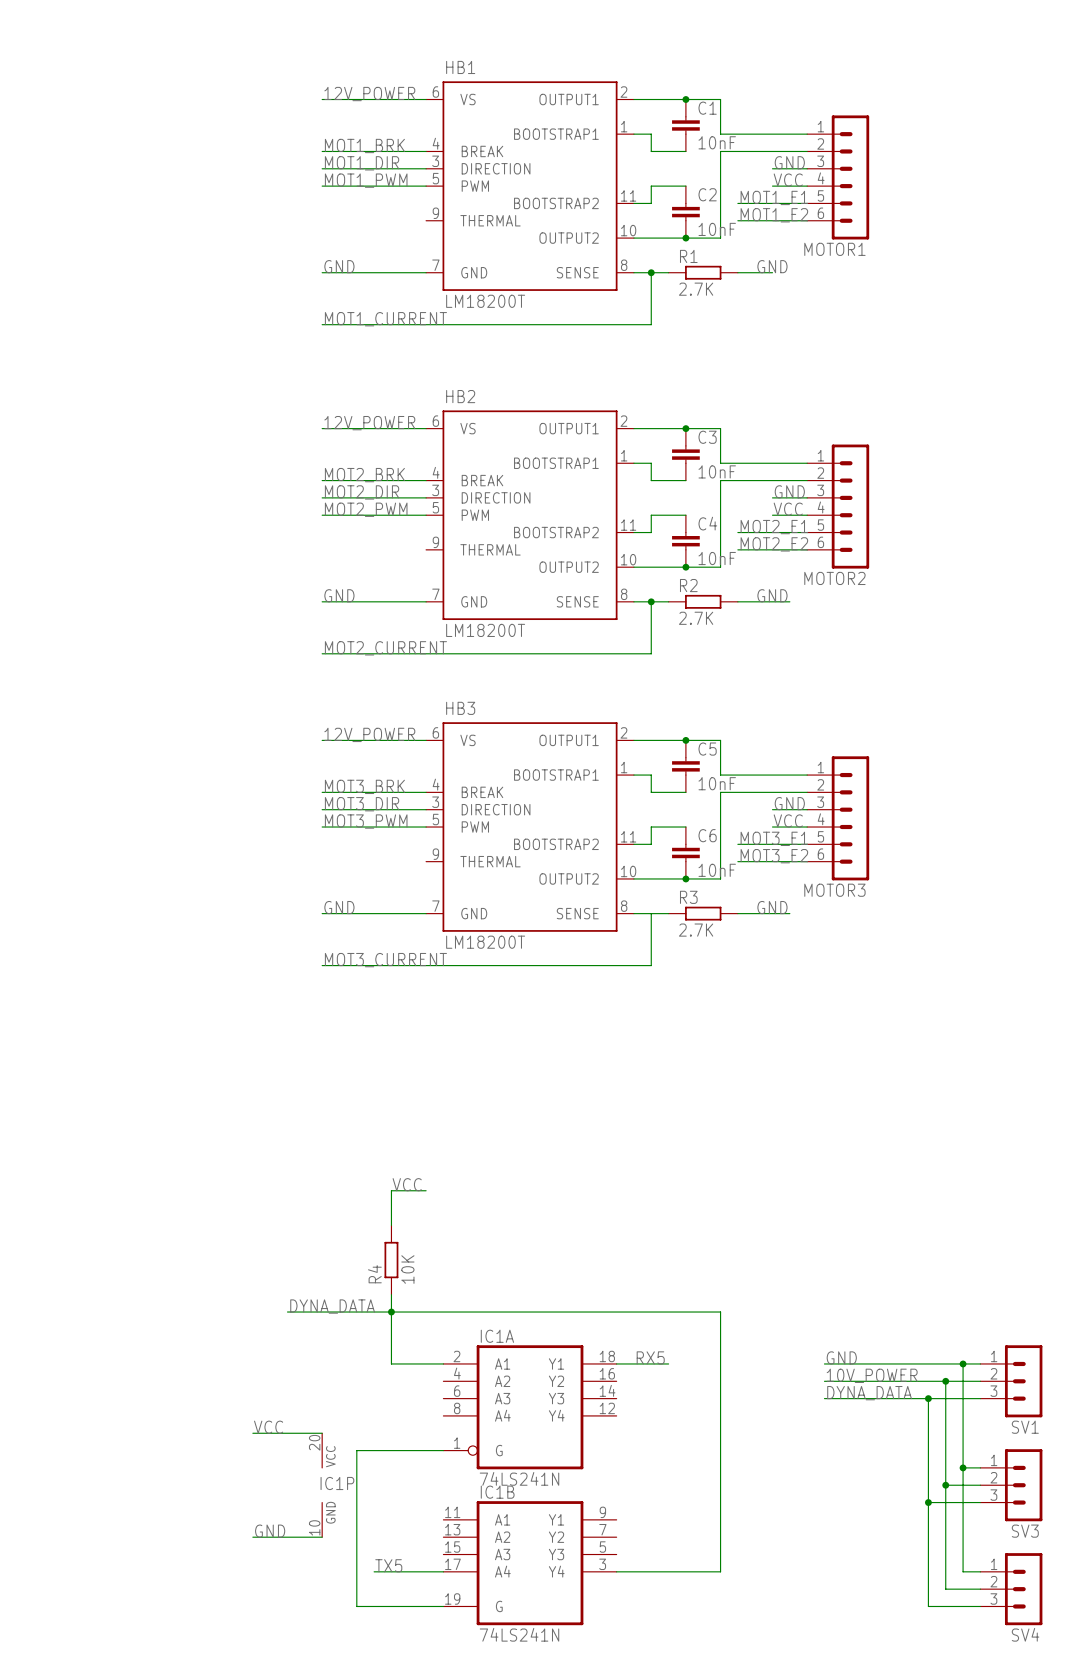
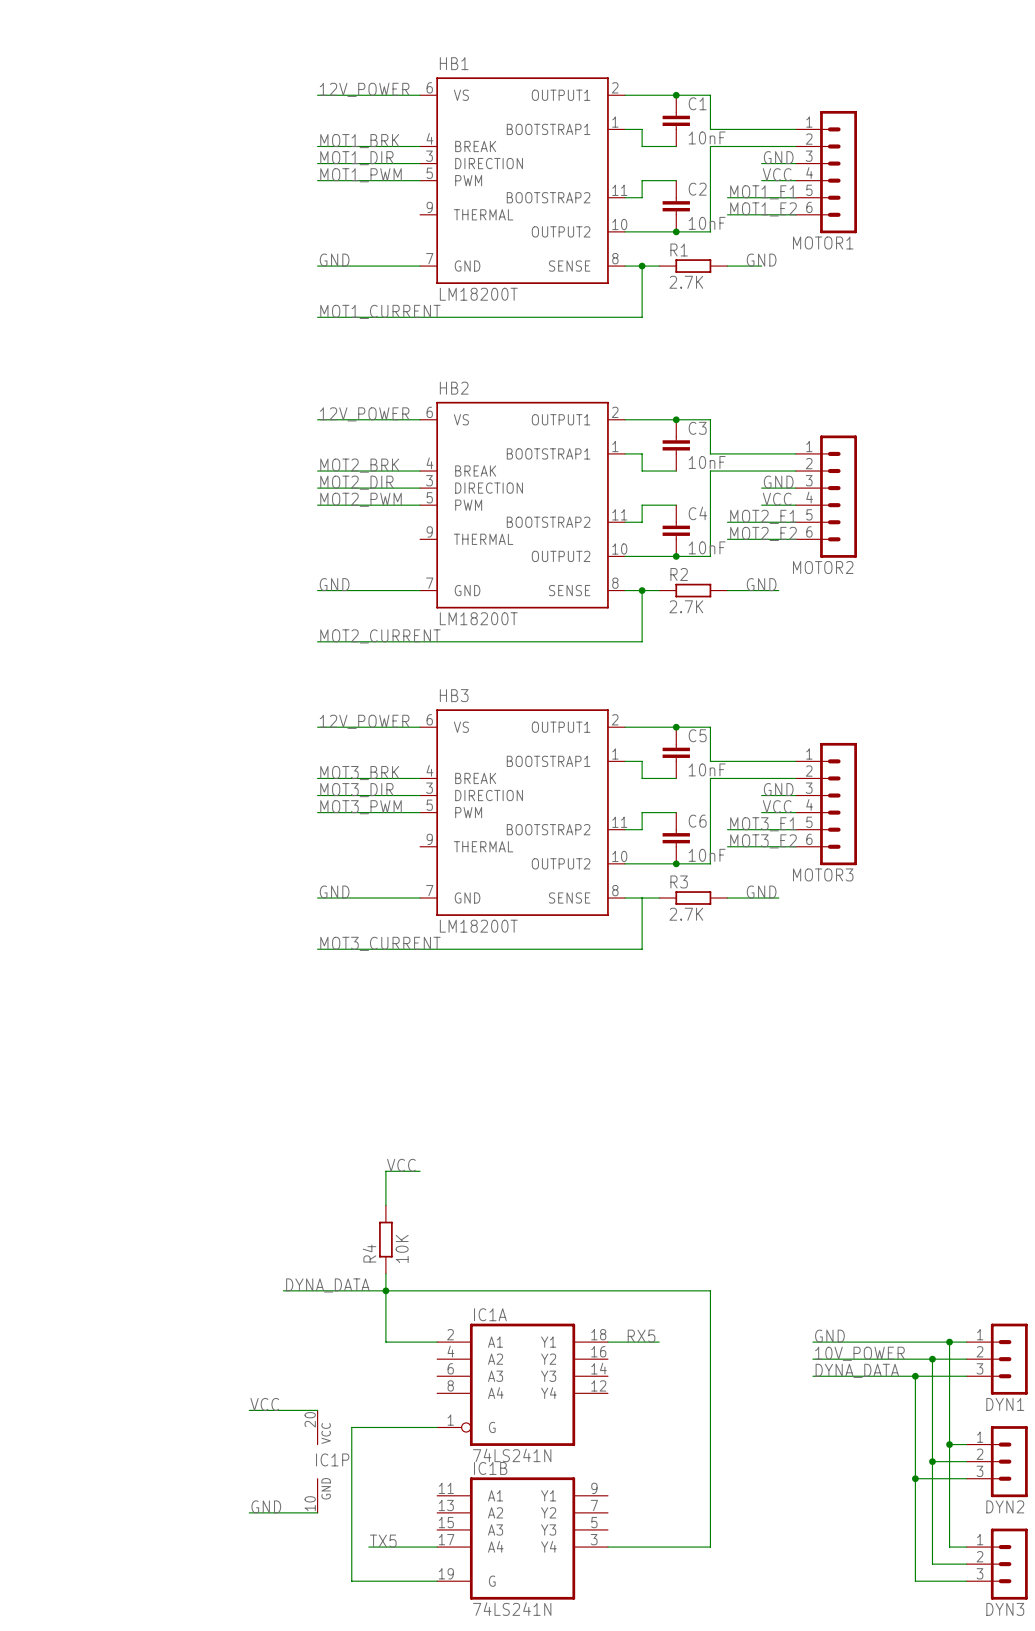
SV1 name: SV1 (1025, 1427) -> DYN1 (1005, 1404)
SV3 name: SV3 (1025, 1531) -> DYN2 (1005, 1506)
SV4 name: SV4 (1025, 1634) -> DYN3 (1005, 1609)

